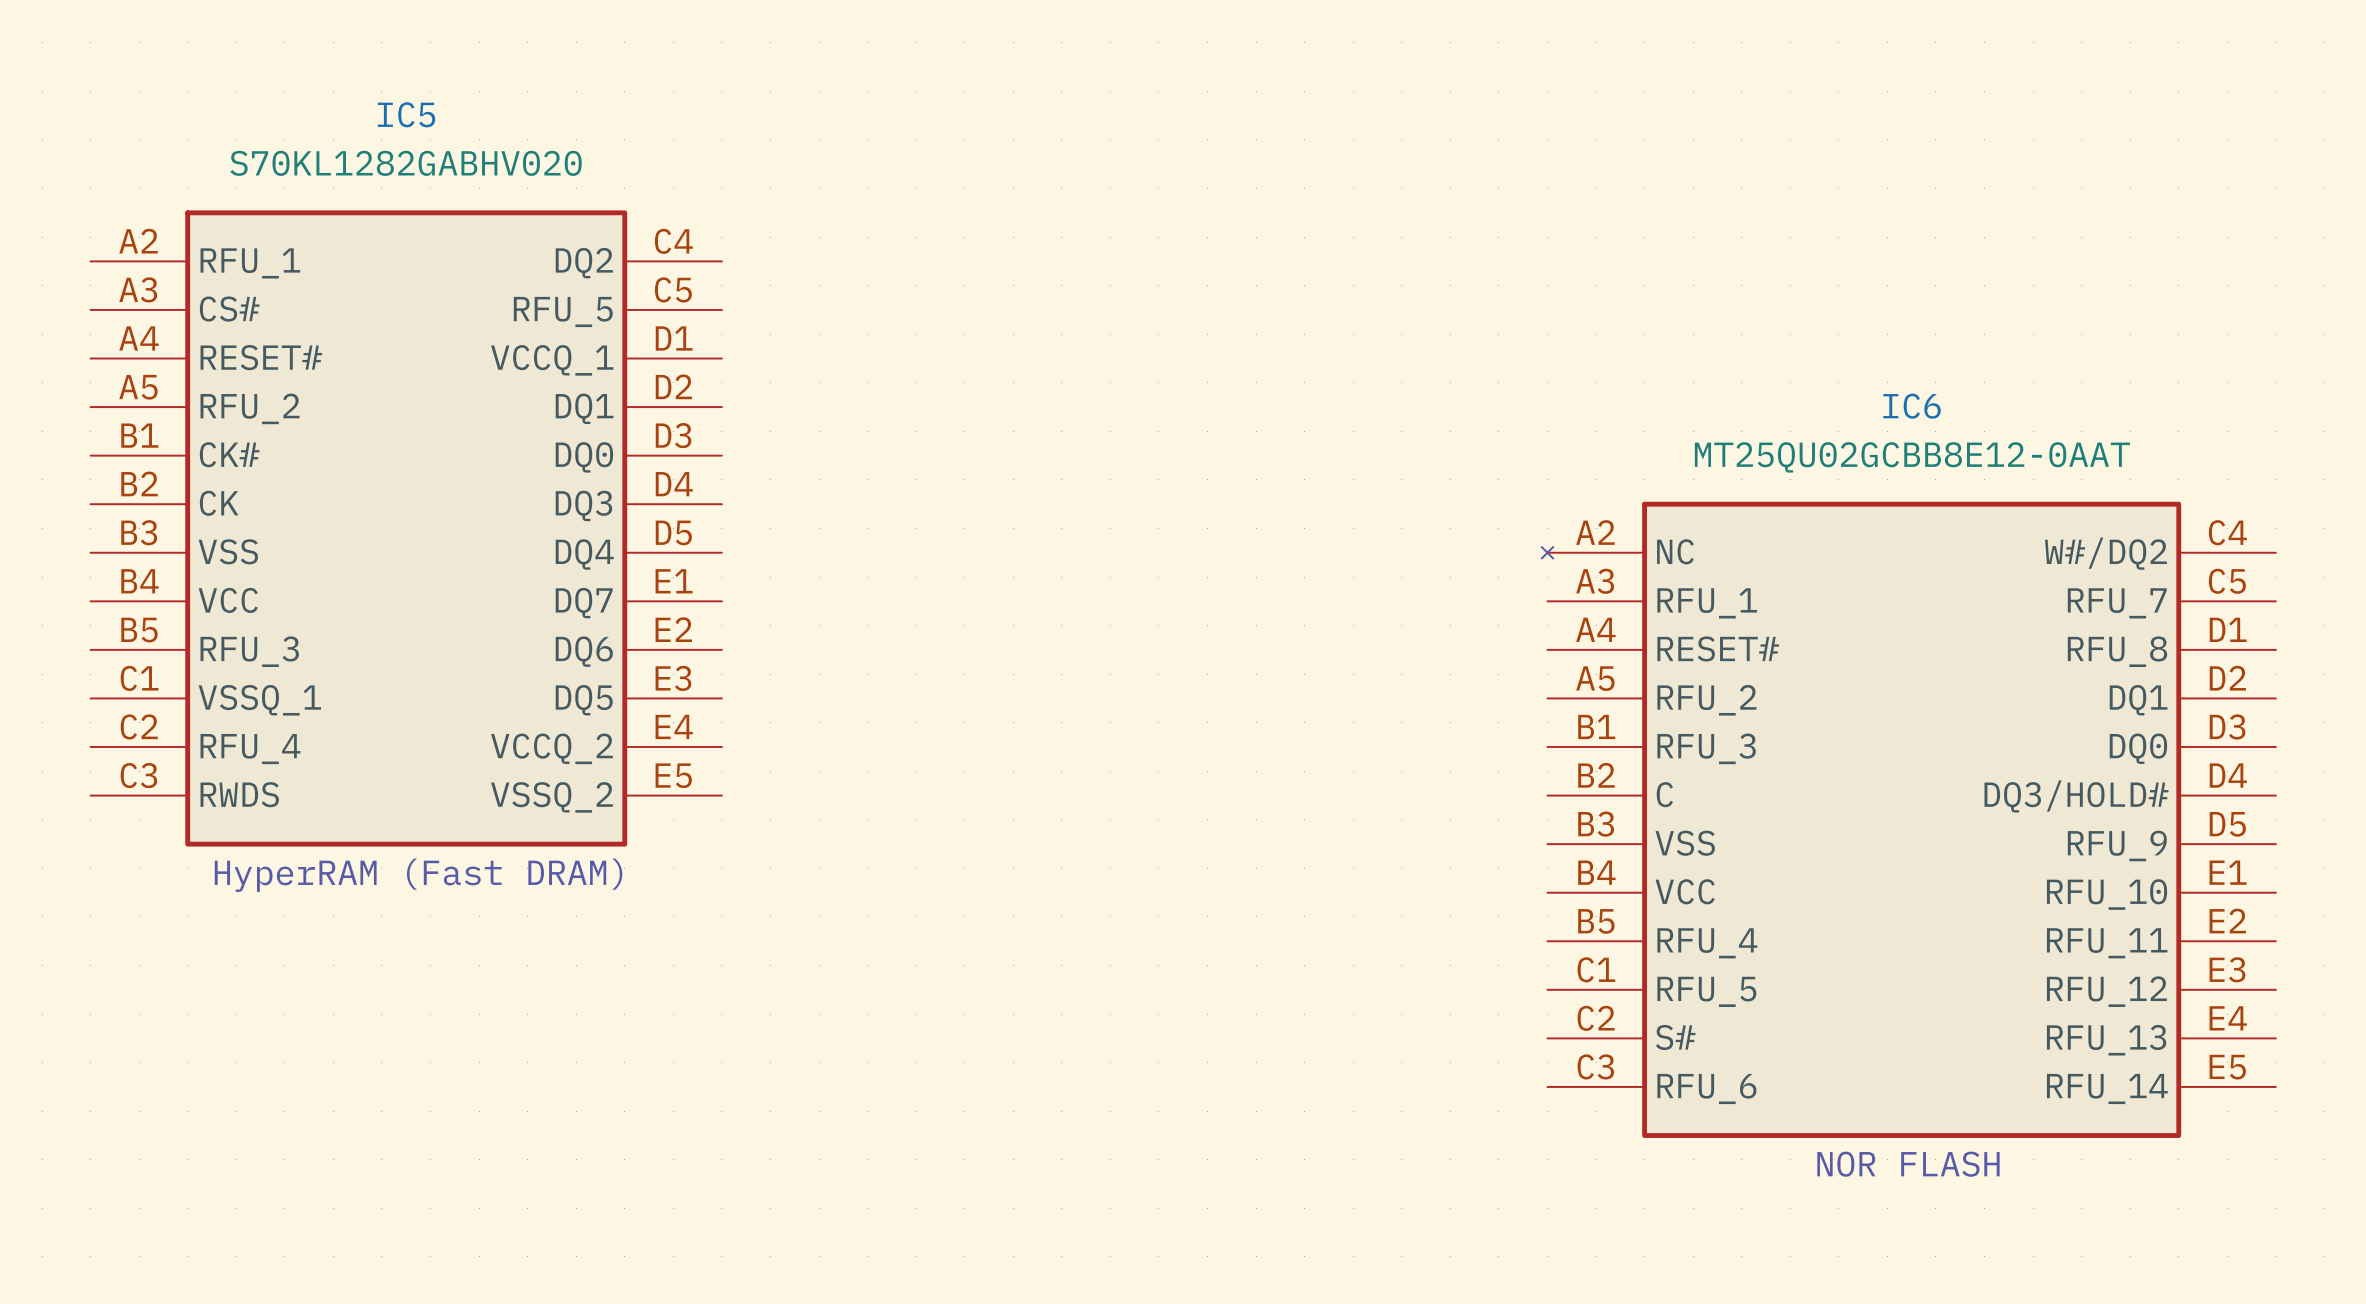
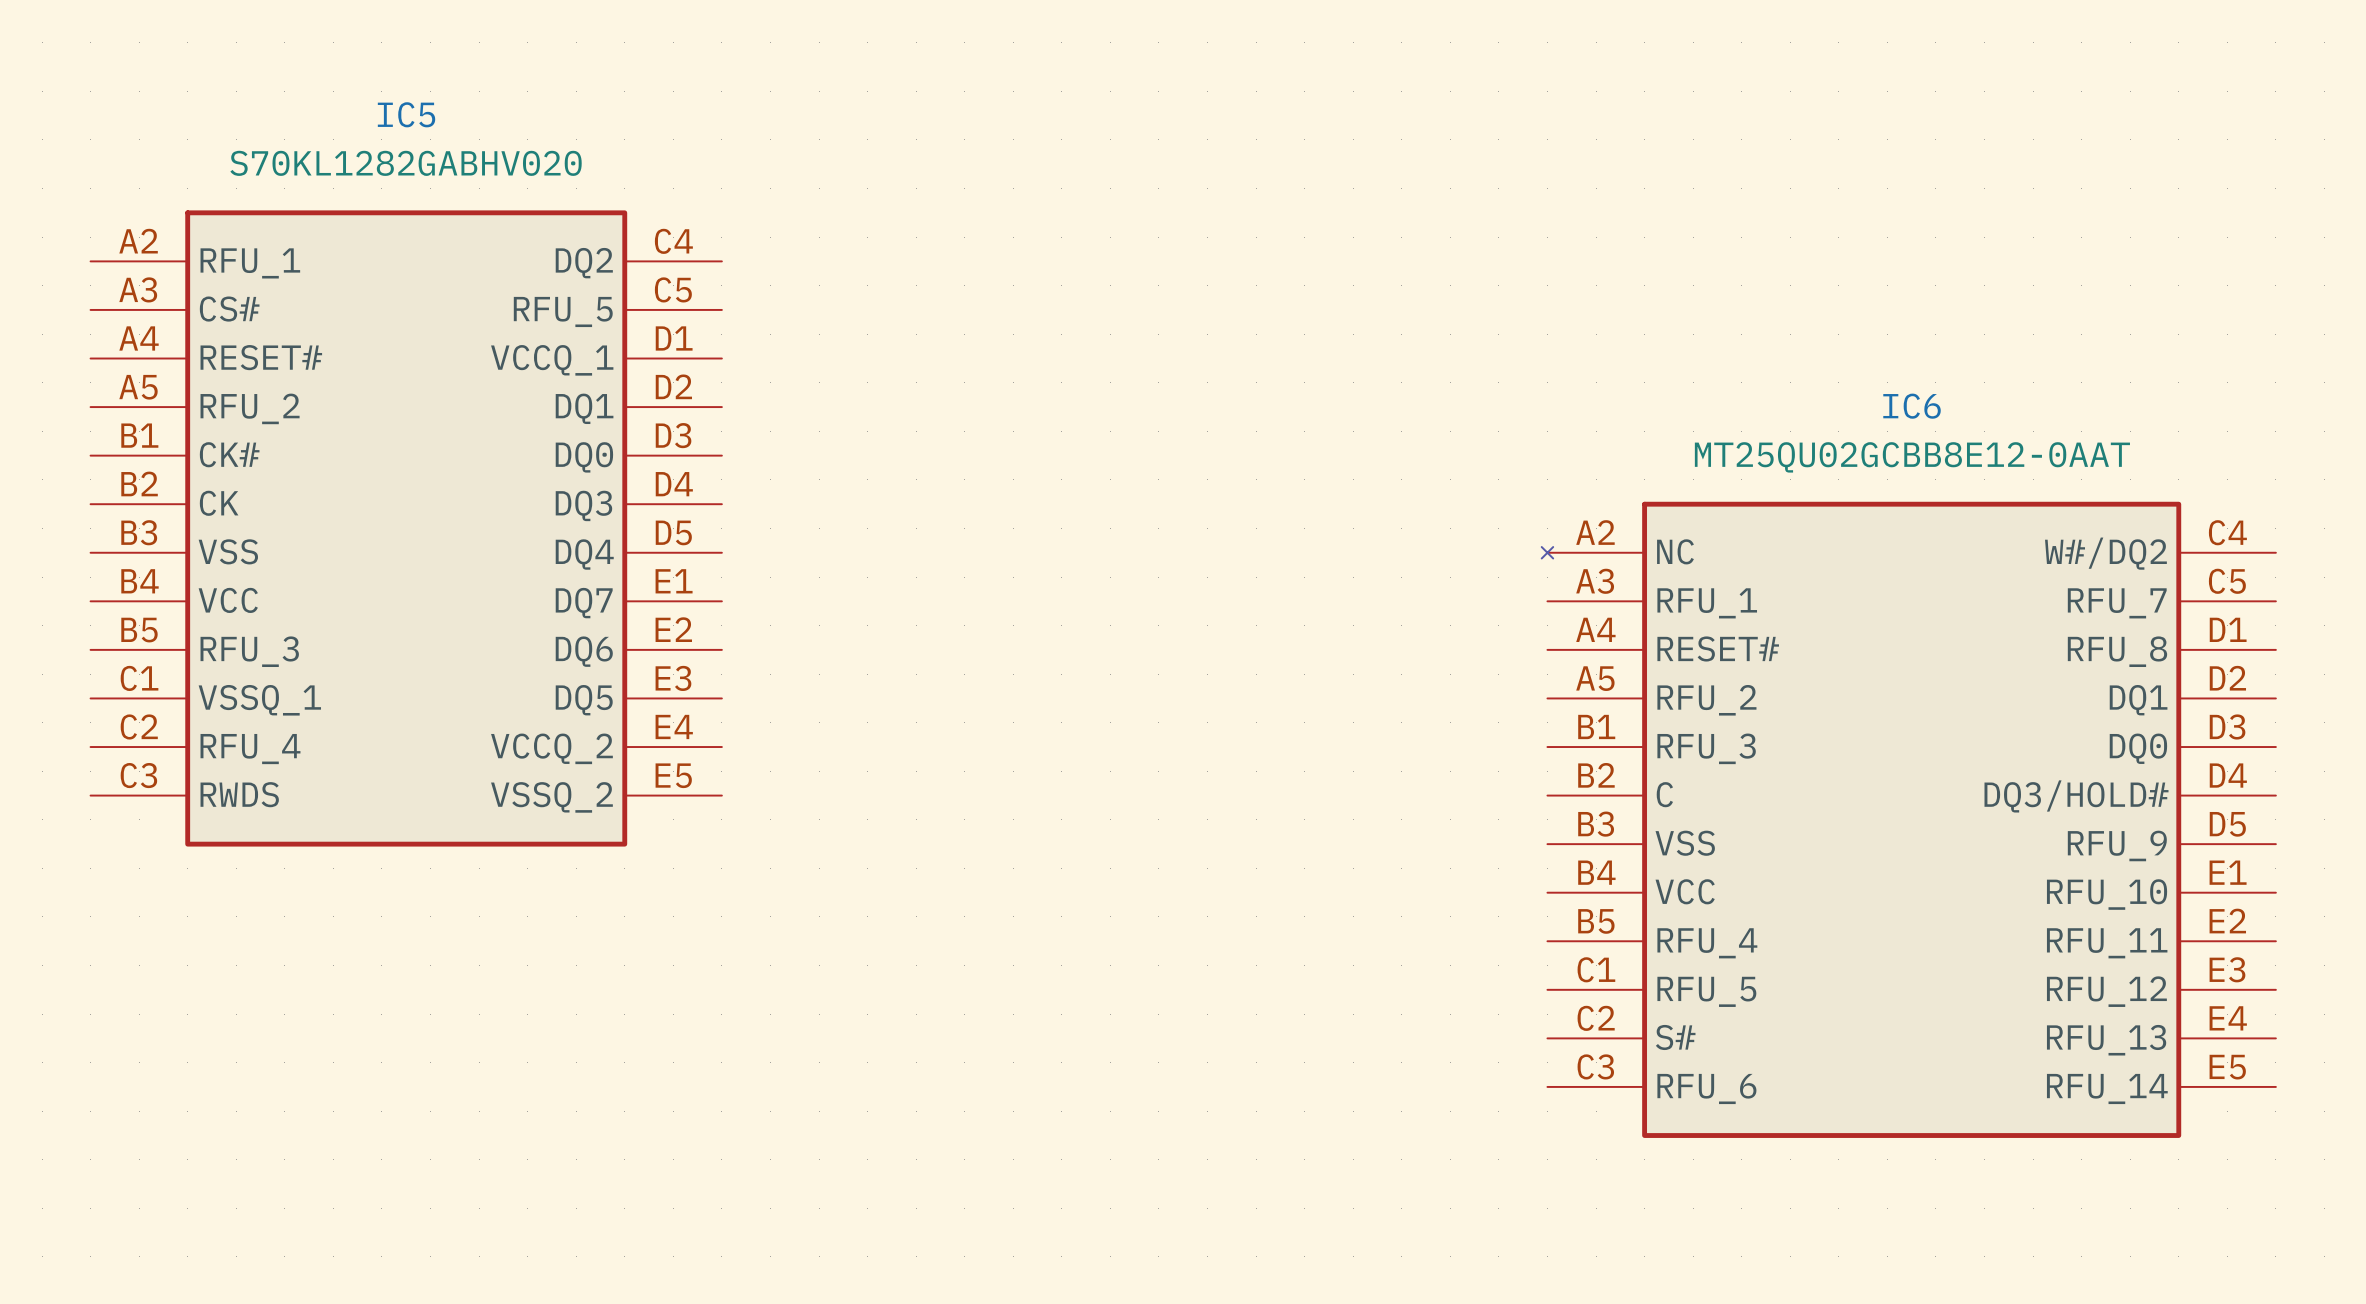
text: HyperRAM (Fast DRAM) (418, 875) -> none
text: NOR FLASH (1908, 1164) -> none

